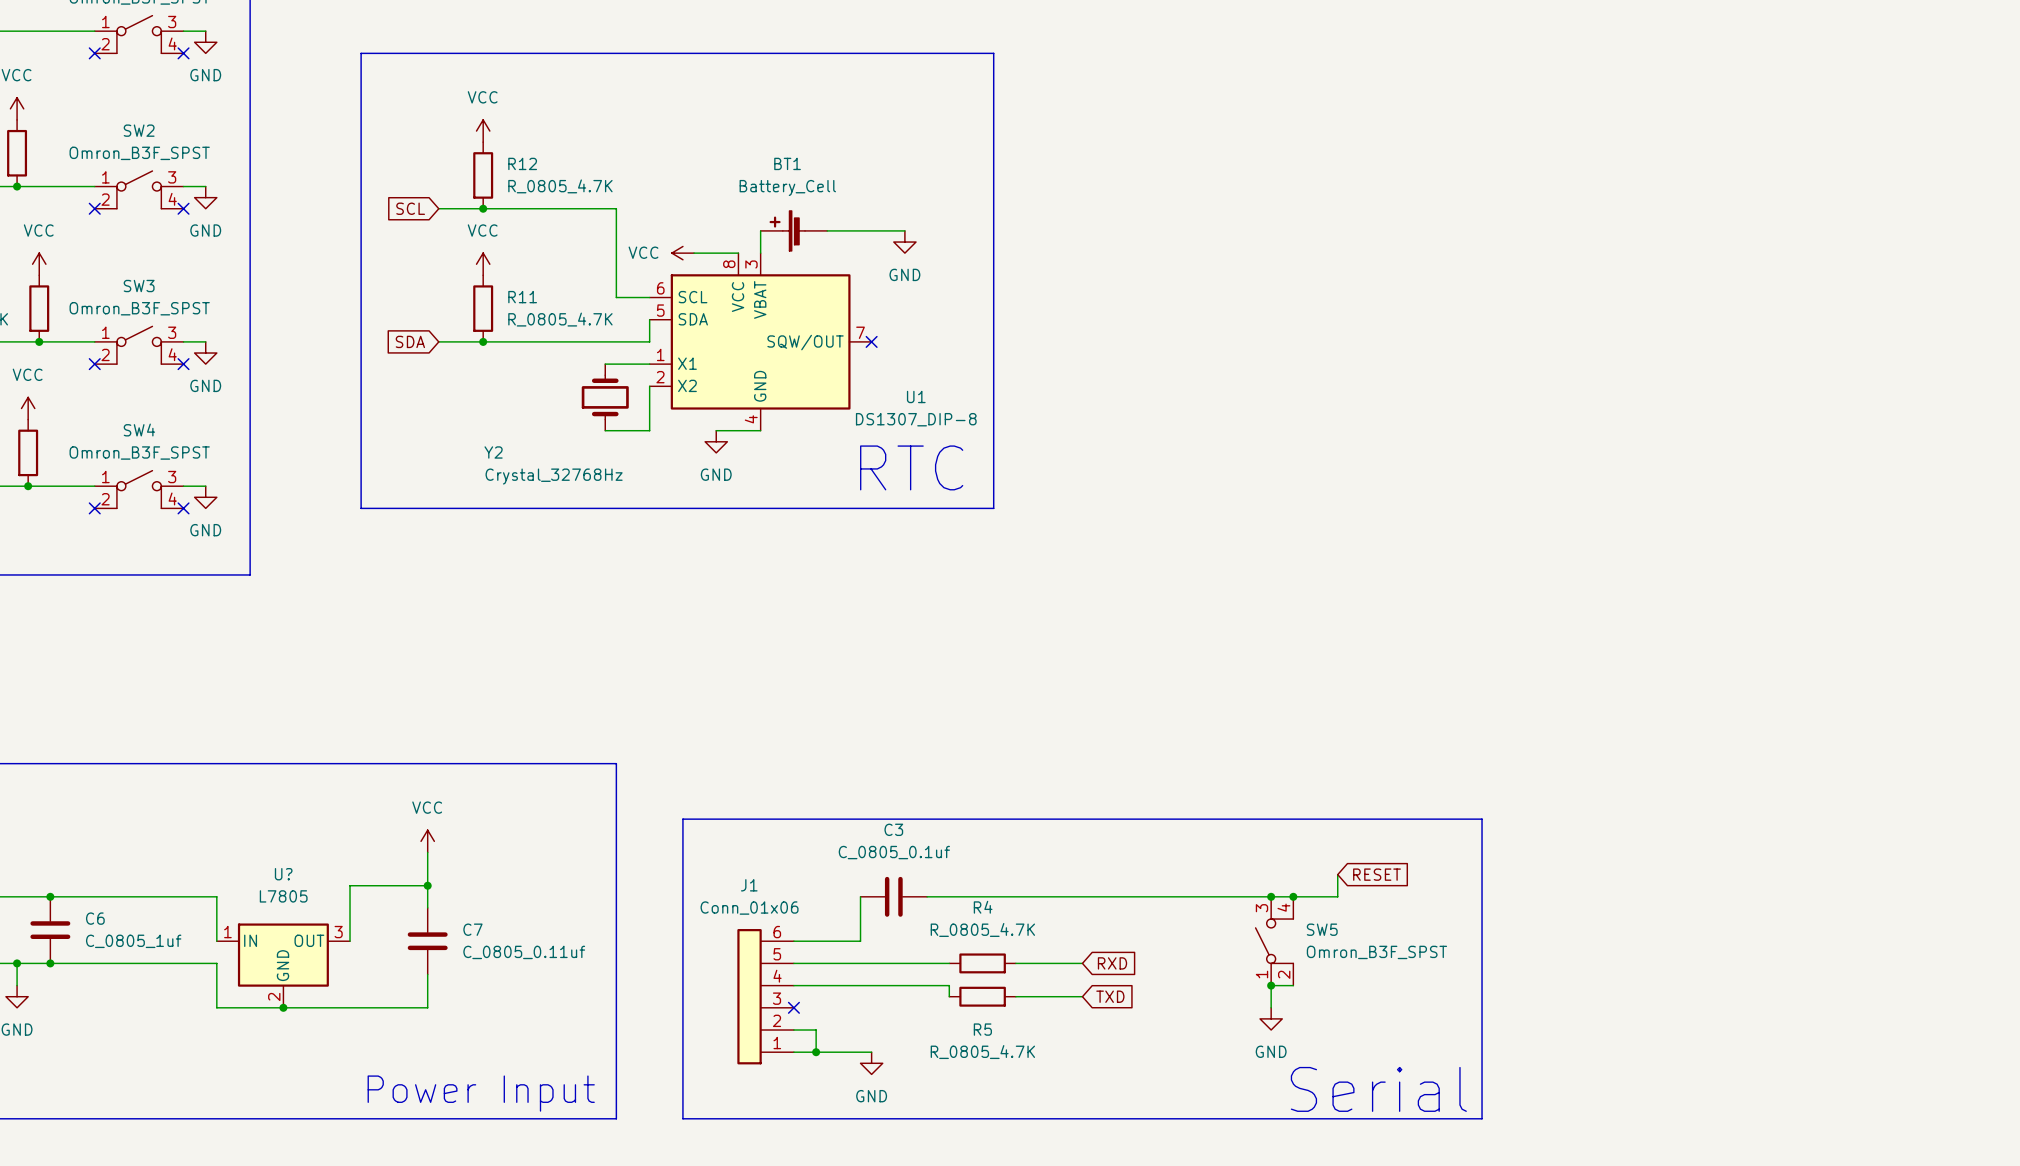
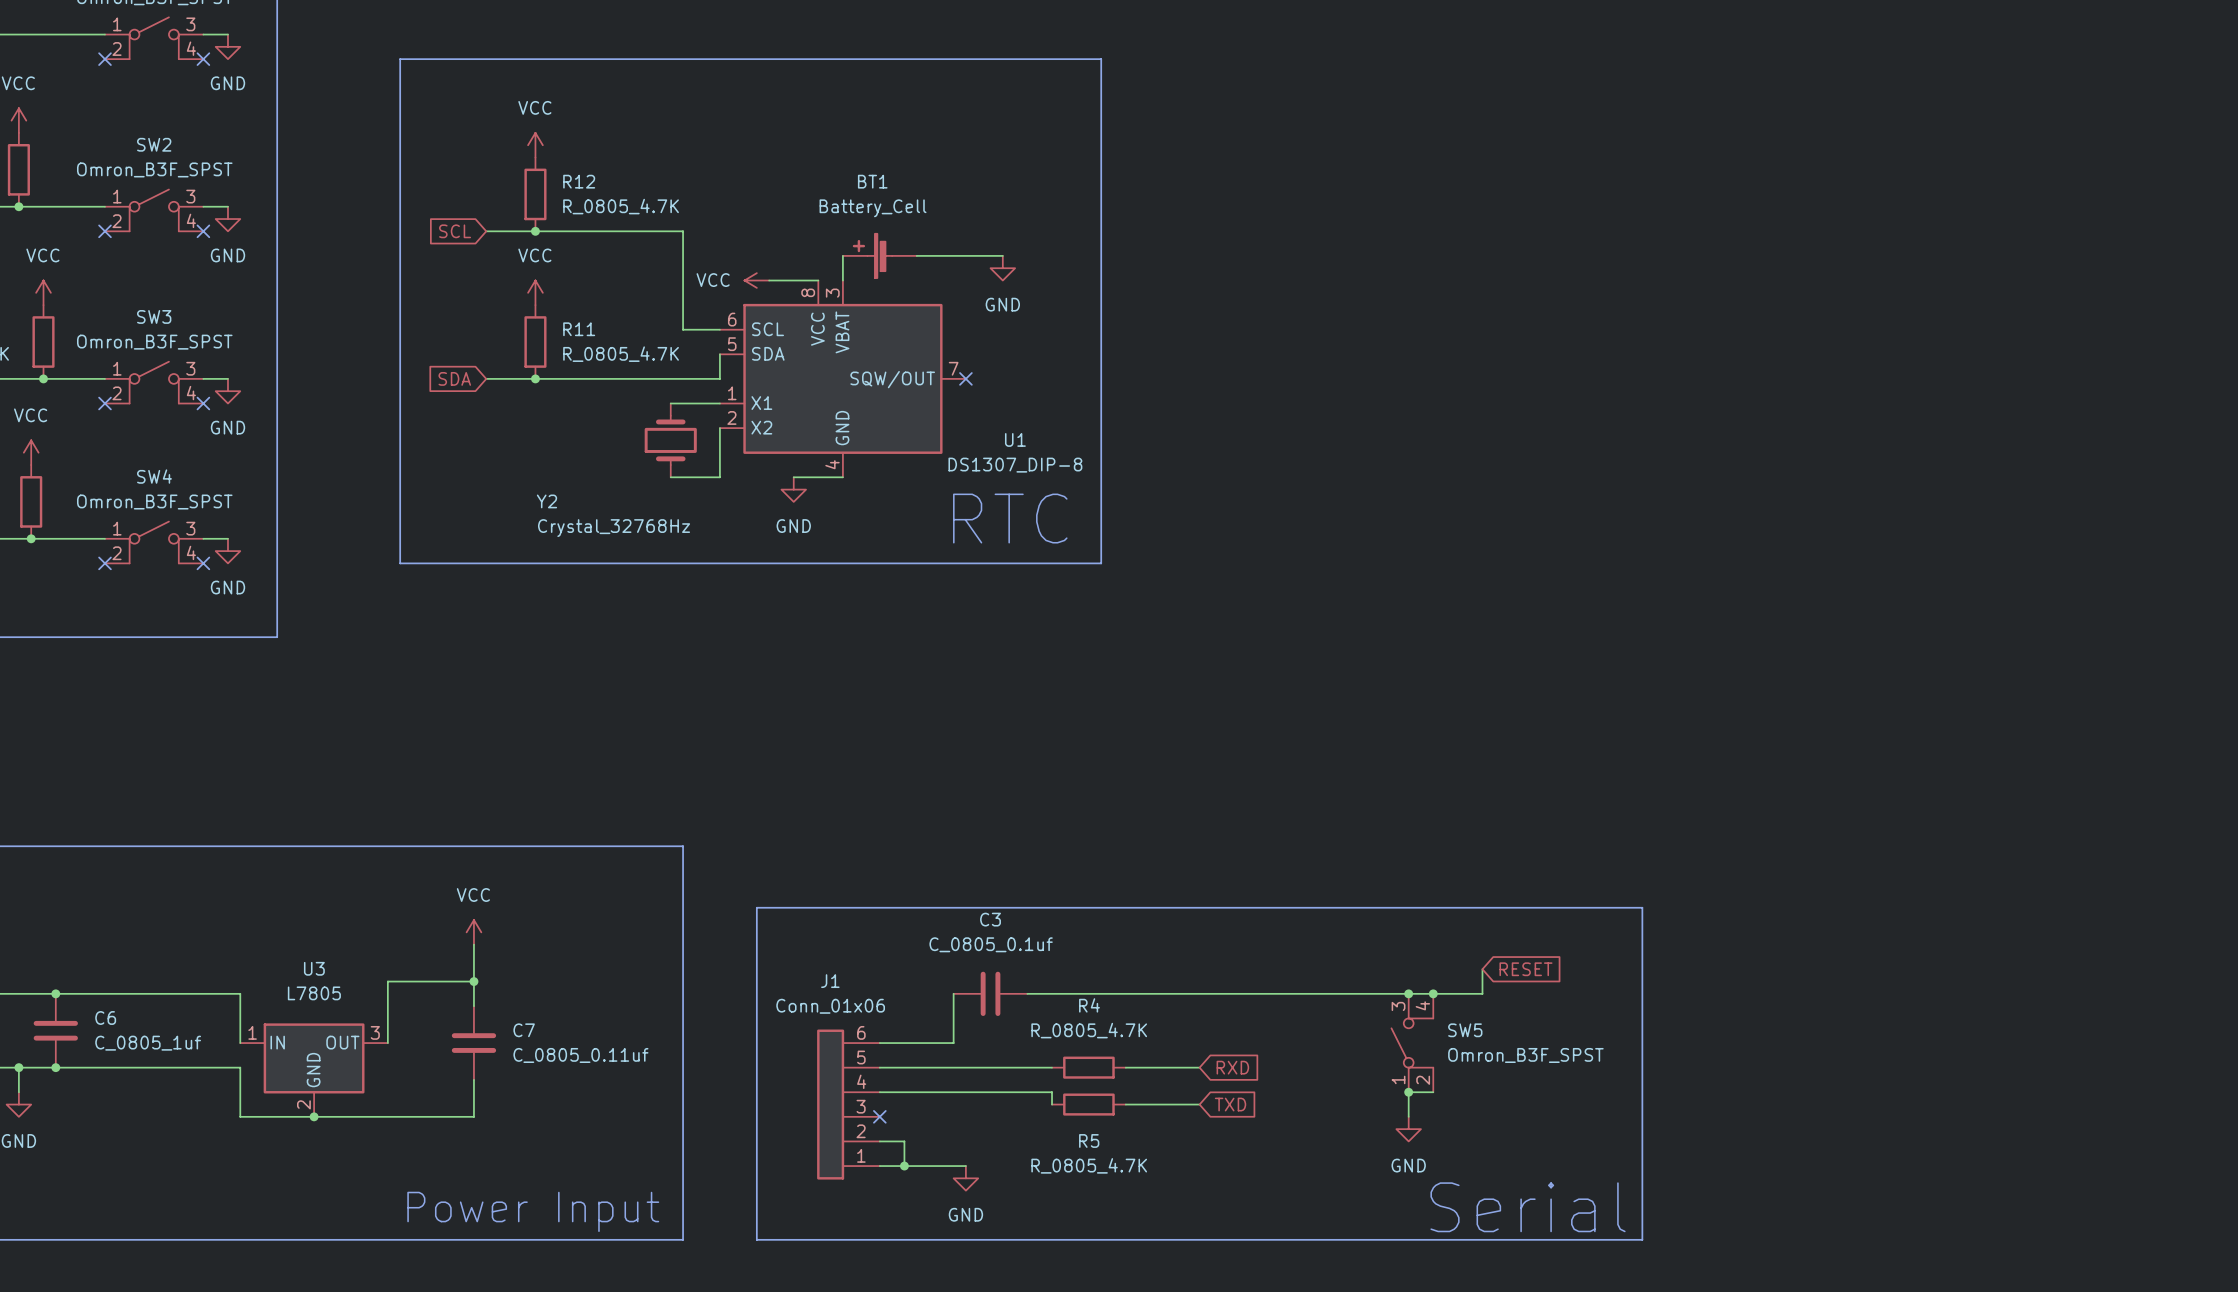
U? name: U? (283, 874) -> U3 (314, 968)

